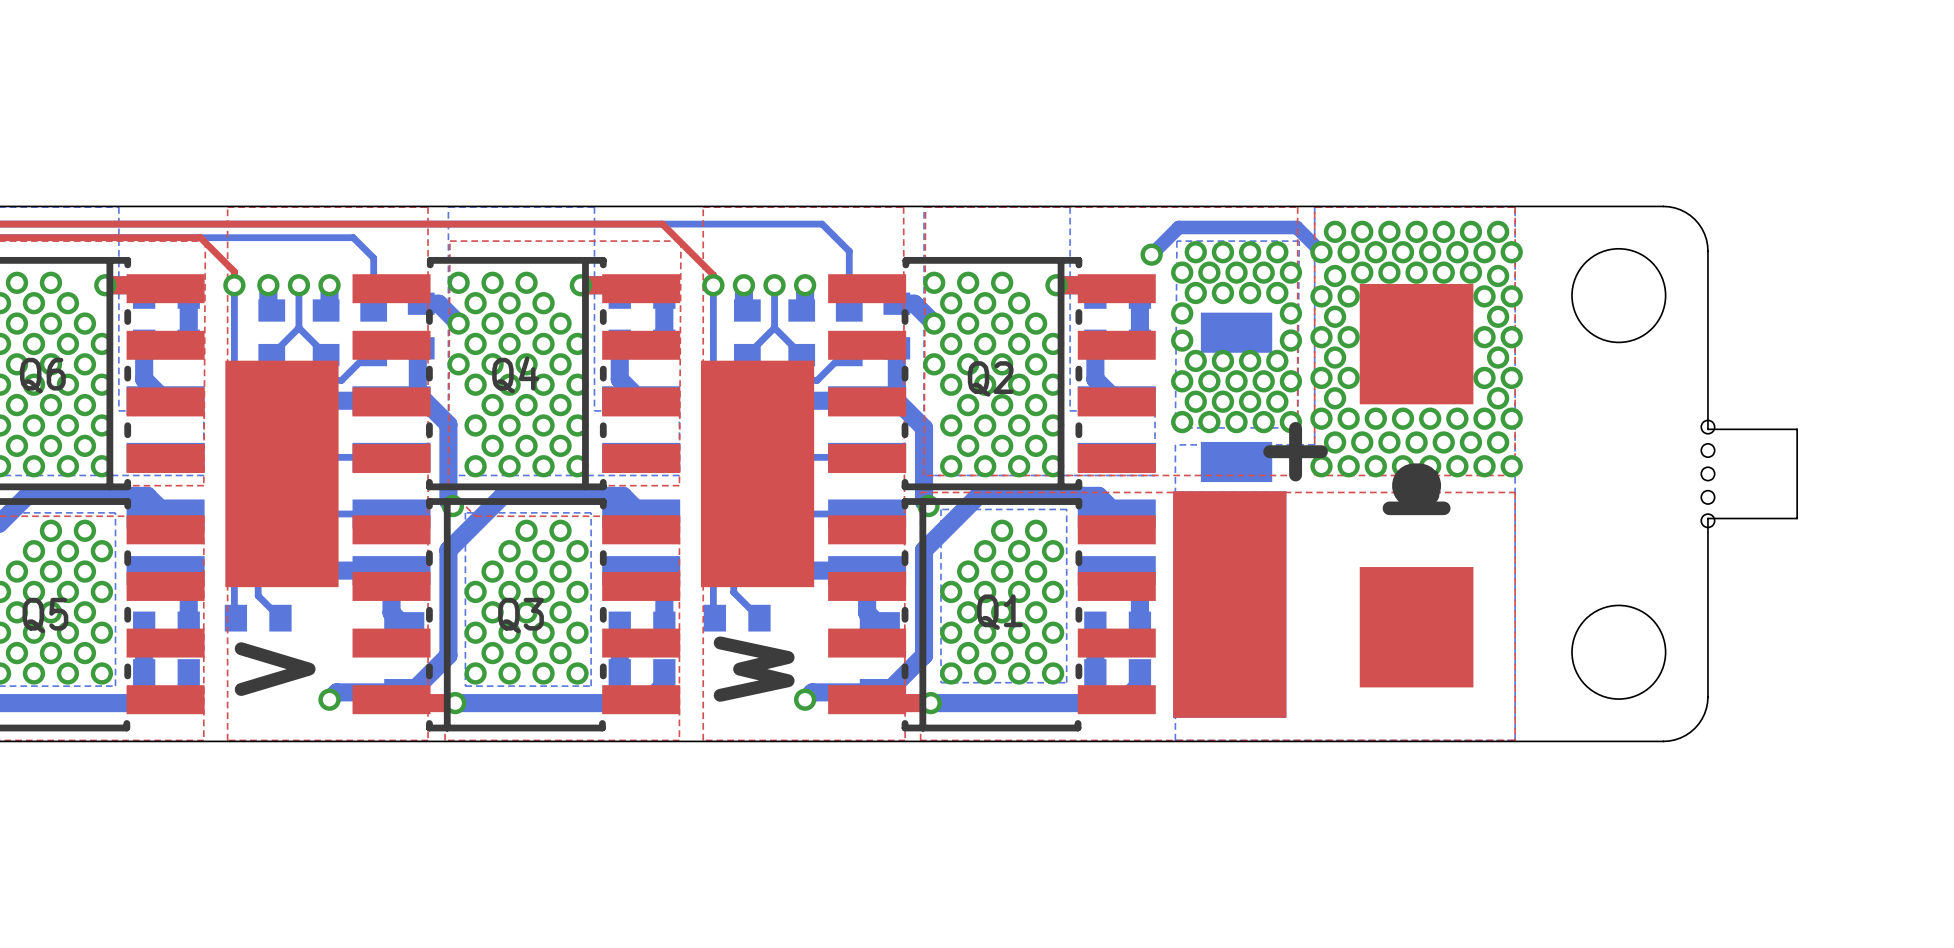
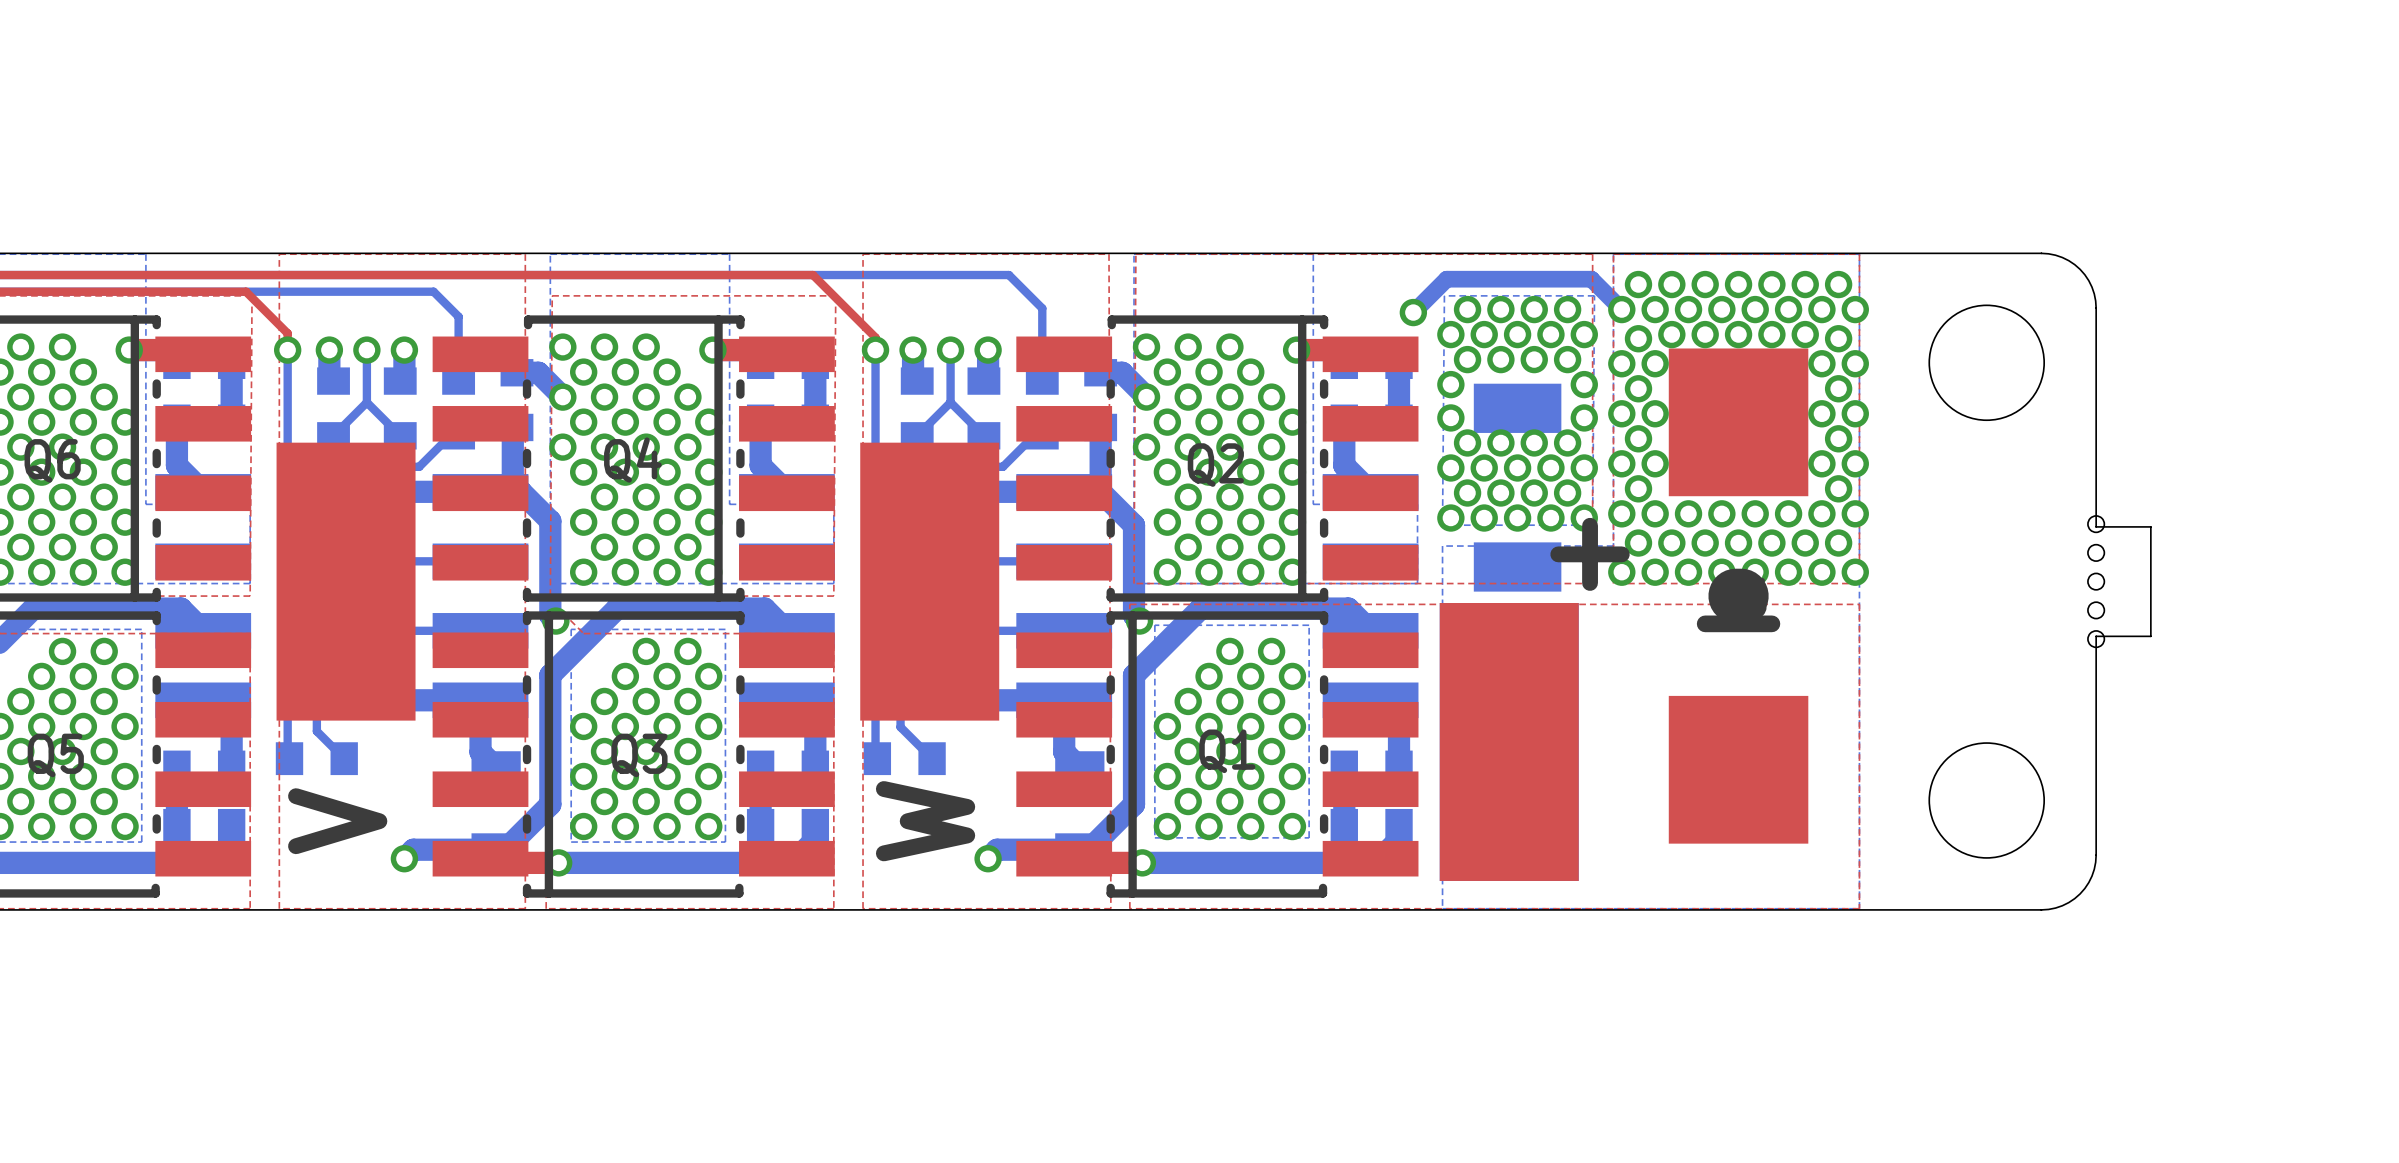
board edge: (1752, 429) (1797, 429) (1797, 518) (1752, 518) -> (2150, 526) (2150, 636)

